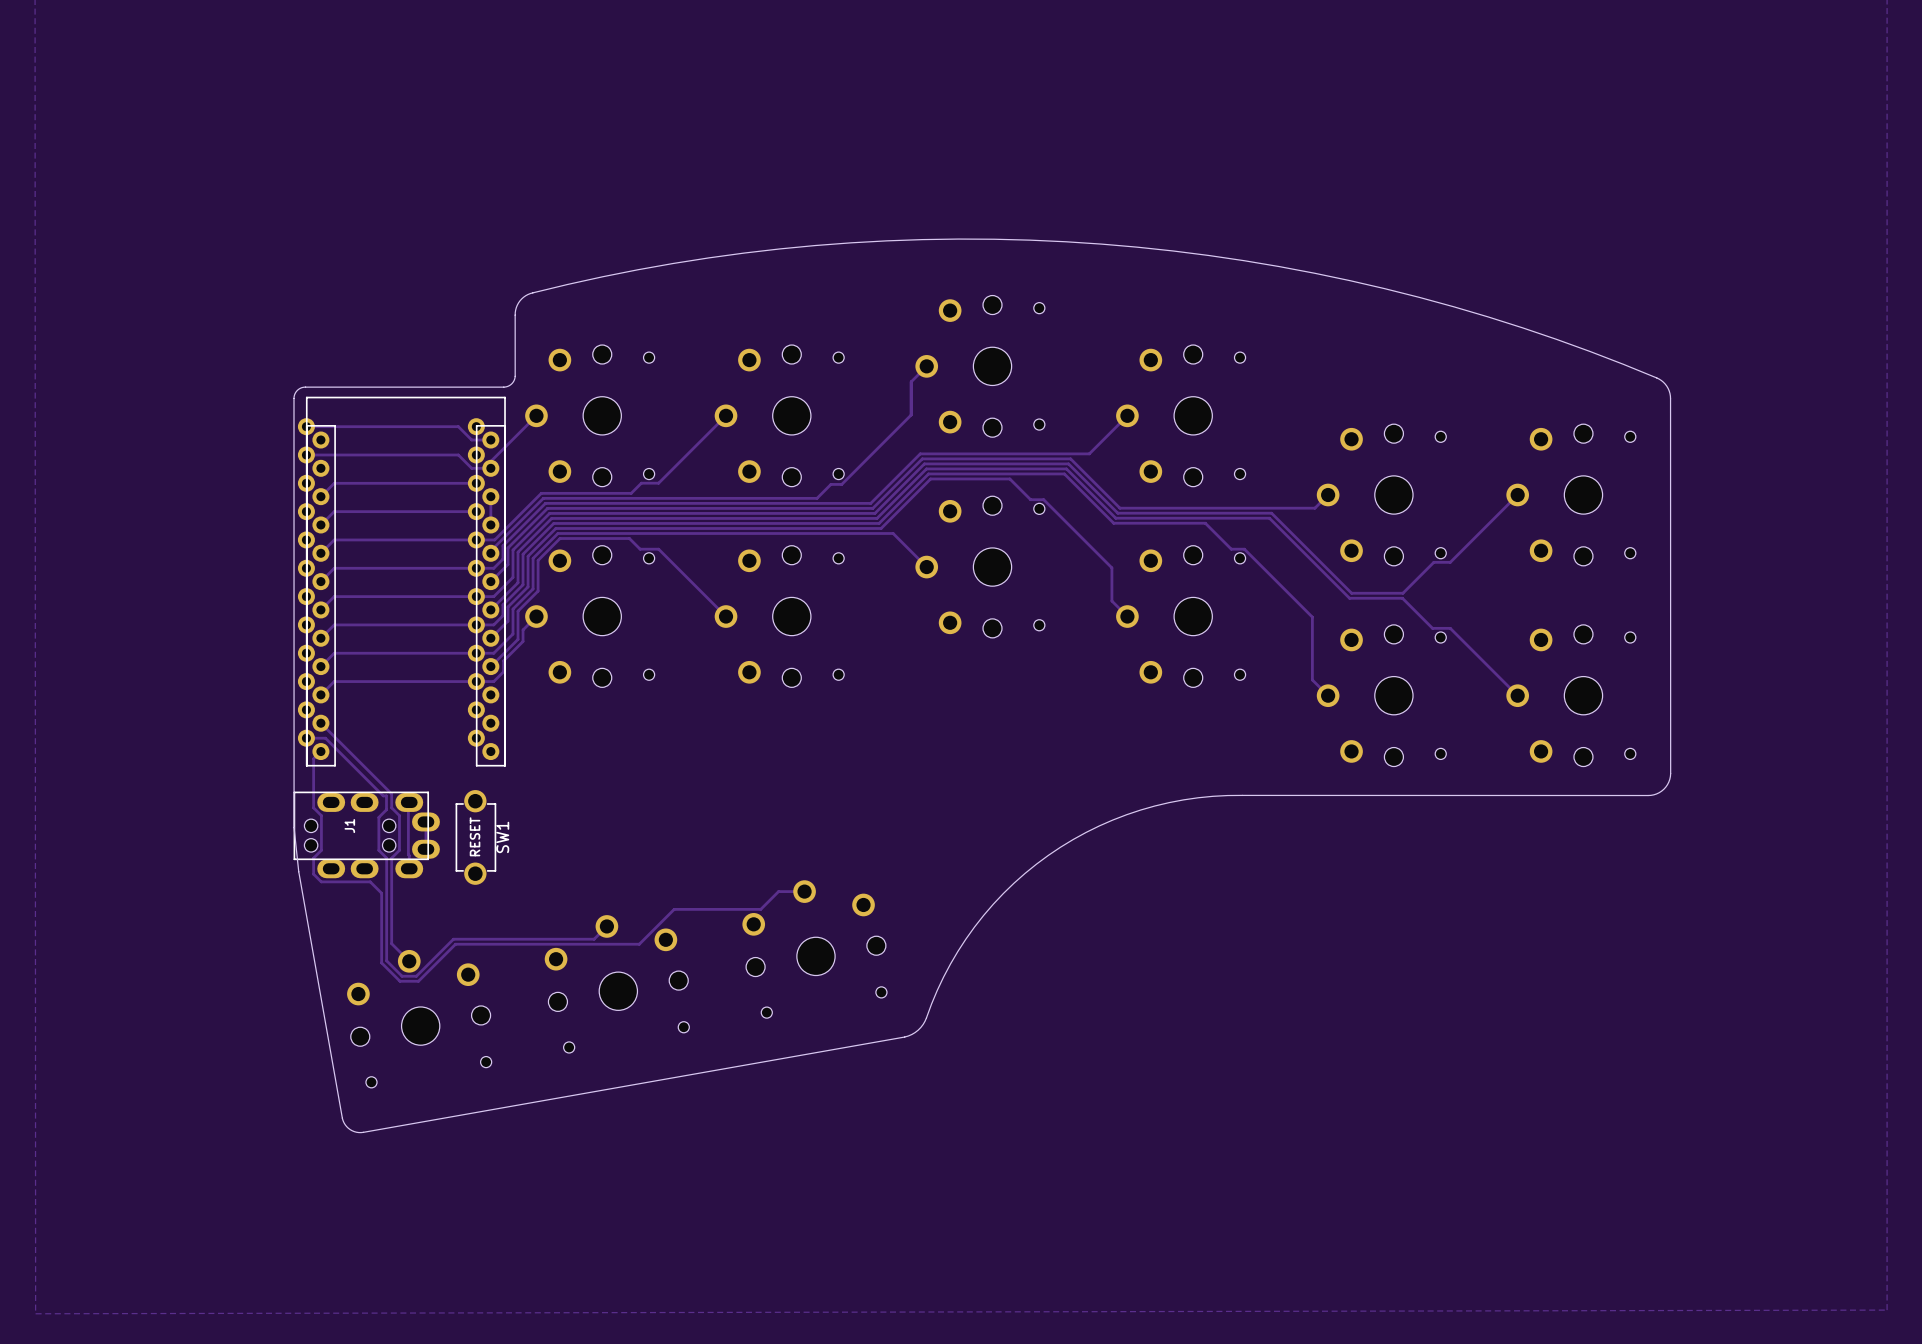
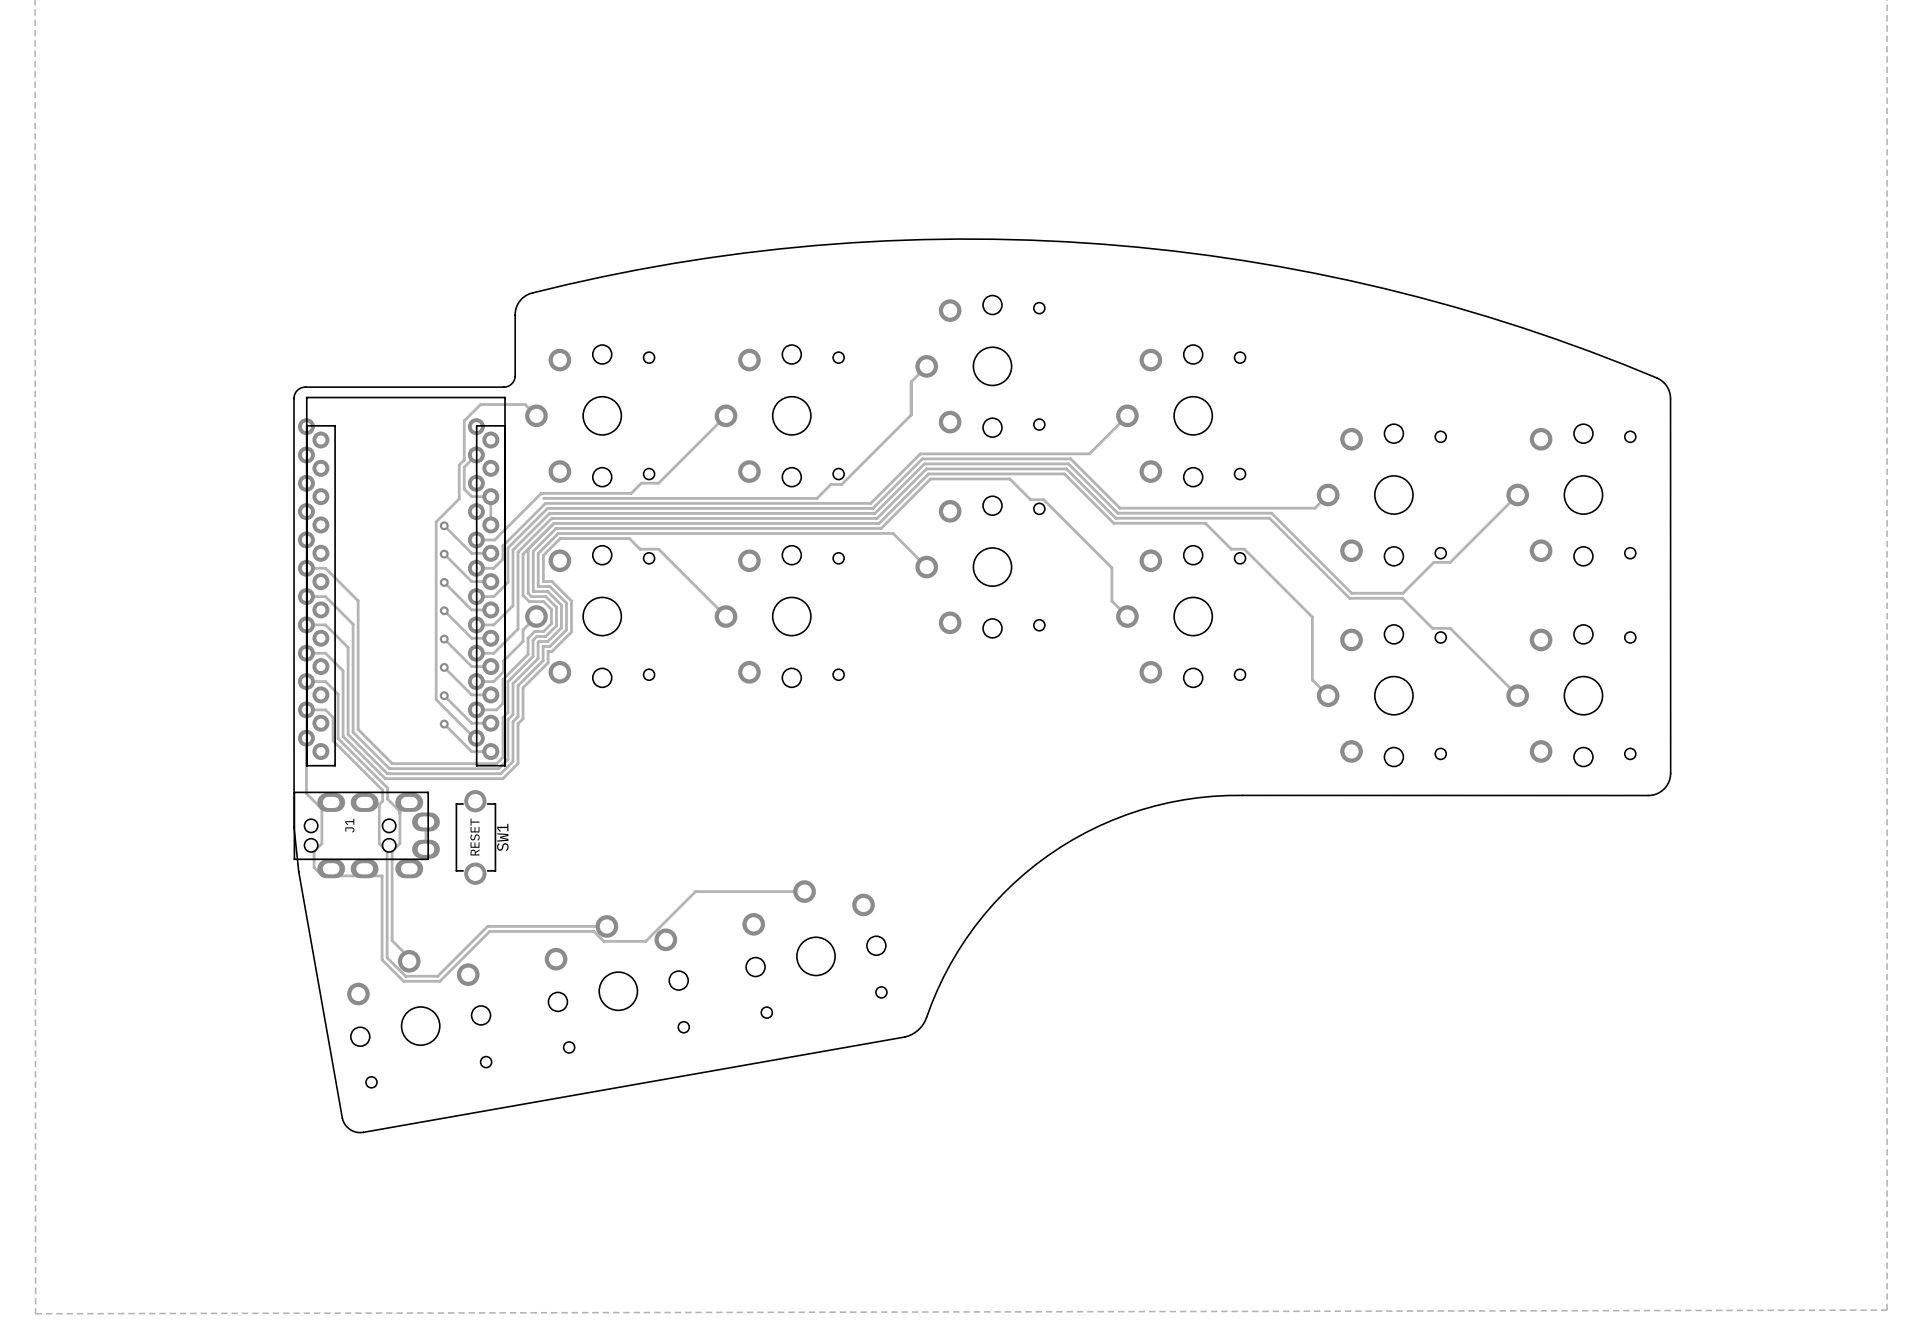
track: (536, 415) (490, 461) (490, 468) (471, 468) (458, 455) (306, 455) -> (536, 415) (525, 404) (480, 404) (464, 420) (464, 460) (459, 465) (459, 498) (436, 521) (436, 699) (476, 738)
track: (306, 426) (458, 426) (471, 440) (490, 440) -> none
track: none -> (476, 455) (464, 467) (464, 489) (471, 496) (490, 496)
track: (476, 483) (334, 483) (320, 496) -> none
track: (543, 498) (490, 550) (490, 553) -> (444, 525) (471, 553) (490, 553)
track: (476, 511) (334, 511) (320, 524) -> none
track: none -> (553, 523) (528, 549) (528, 593) (531, 596) (545, 596) (556, 607) (556, 625) (545, 636) (536, 636) (533, 640) (533, 656) (507, 681) (507, 712) (502, 717) (502, 757) (496, 763) (392, 763) (358, 729) (358, 600) (325, 568) (306, 568)
via: none -> (444, 525)
track: (555, 528) (528, 556) (528, 586) (507, 606) (507, 621) (490, 638) -> (444, 610) (471, 638) (490, 638)
track: none -> (556, 528) (533, 551) (533, 591) (547, 591) (561, 605) (561, 627) (547, 641) (538, 642) (538, 658) (513, 683) (513, 714) (507, 719) (507, 759) (498, 768) (389, 768) (353, 732) (353, 624) (325, 596) (306, 596)
track: (557, 533) (533, 558) (533, 589) (513, 609) (513, 634) -> (558, 533) (538, 553) (538, 586)
track: (560, 538) (538, 560) (538, 591) (518, 611) -> (560, 538) (543, 555) (543, 581) (551, 581) (571, 601) (571, 632) (551, 651) (548, 651) (548, 662) (523, 687) (523, 718) (518, 723) (518, 763) (502, 778) (385, 778) (343, 736) (343, 670) (325, 653) (306, 653)
track: (476, 539) (334, 539) (320, 553) -> none
via: none -> (444, 554)
track: (507, 564) (490, 581) -> (444, 554) (471, 581) (490, 581)
track: (476, 568) (334, 568) (320, 581) -> none
track: (513, 577) (507, 582) -> (507, 564) (507, 582)
track: none -> (444, 582) (471, 609) (490, 609)
via: none -> (444, 582)
track: (518, 582) (490, 609) -> (518, 582) (518, 611)
track: (523, 584) (502, 604) (502, 615) -> (513, 577) (513, 605) (502, 615)
track: none -> (523, 584) (523, 595) (529, 601) (543, 601) (551, 609) (551, 623) (543, 631) (534, 631) (528, 638) (528, 654) (502, 679) (502, 703) (496, 709) (476, 709)
track: none -> (538, 586) (549, 586) (566, 603) (566, 629) (549, 646) (543, 646) (543, 660) (518, 685) (518, 716) (513, 721) (513, 761) (500, 773) (387, 773) (348, 734) (348, 647) (325, 624) (306, 624)
track: (476, 596) (334, 596) (320, 609) -> none
via: none -> (444, 610)
track: (476, 624) (334, 624) (320, 638) -> none
track: (518, 629) (518, 639) (490, 666) -> (518, 629) (513, 634)
track: none -> (444, 639) (471, 666) (490, 666)
via: none -> (444, 639)
track: (476, 653) (334, 653) (320, 666) -> none
track: none -> (444, 667) (471, 694) (490, 694)
via: none -> (444, 667)
track: none -> (306, 681) (325, 681) (338, 694) (338, 738) (387, 788) (387, 799) (399, 811) (399, 843) (392, 851) (392, 940) (412, 961)
track: (476, 681) (334, 681) (320, 694) -> none
track: none -> (444, 695) (471, 723) (490, 723)
via: none -> (444, 695)
track: none -> (306, 709) (325, 709) (333, 717) (333, 740) (382, 790) (382, 801) (379, 804) (379, 843) (387, 851) (387, 957) (405, 976)
track: (320, 723) (391, 793) (391, 807) (399, 815) (399, 850) (391, 858) (391, 943) (409, 961) -> none
track: none -> (444, 724) (471, 751) (490, 751)
via: none -> (444, 724)
track: (306, 738) (325, 738) (383, 795) (386, 795) (386, 809) (378, 817) (378, 850) (386, 858) (386, 960) (402, 976) (405, 976) -> (306, 738) (306, 793) (321, 808) (321, 843) (314, 851) (314, 867) (322, 875) (382, 875) (382, 959) (403, 981)
track: (320, 751) (313, 758) (313, 807) (321, 815) (321, 850) (313, 858) (313, 874) (321, 881) (370, 881) (381, 893) (381, 962) (400, 981) (403, 981) -> none
track: (409, 802) (409, 868) -> none
track: (778, 891) (760, 909) (674, 909) (639, 944) (455, 944) (418, 981) -> (778, 891) (695, 891) (645, 941) (603, 941) (593, 931) (489, 931) (439, 981) (418, 981)
track: (606, 926) (594, 939) (453, 939) (416, 976) -> (610, 926) (487, 926) (437, 976) (416, 976)

